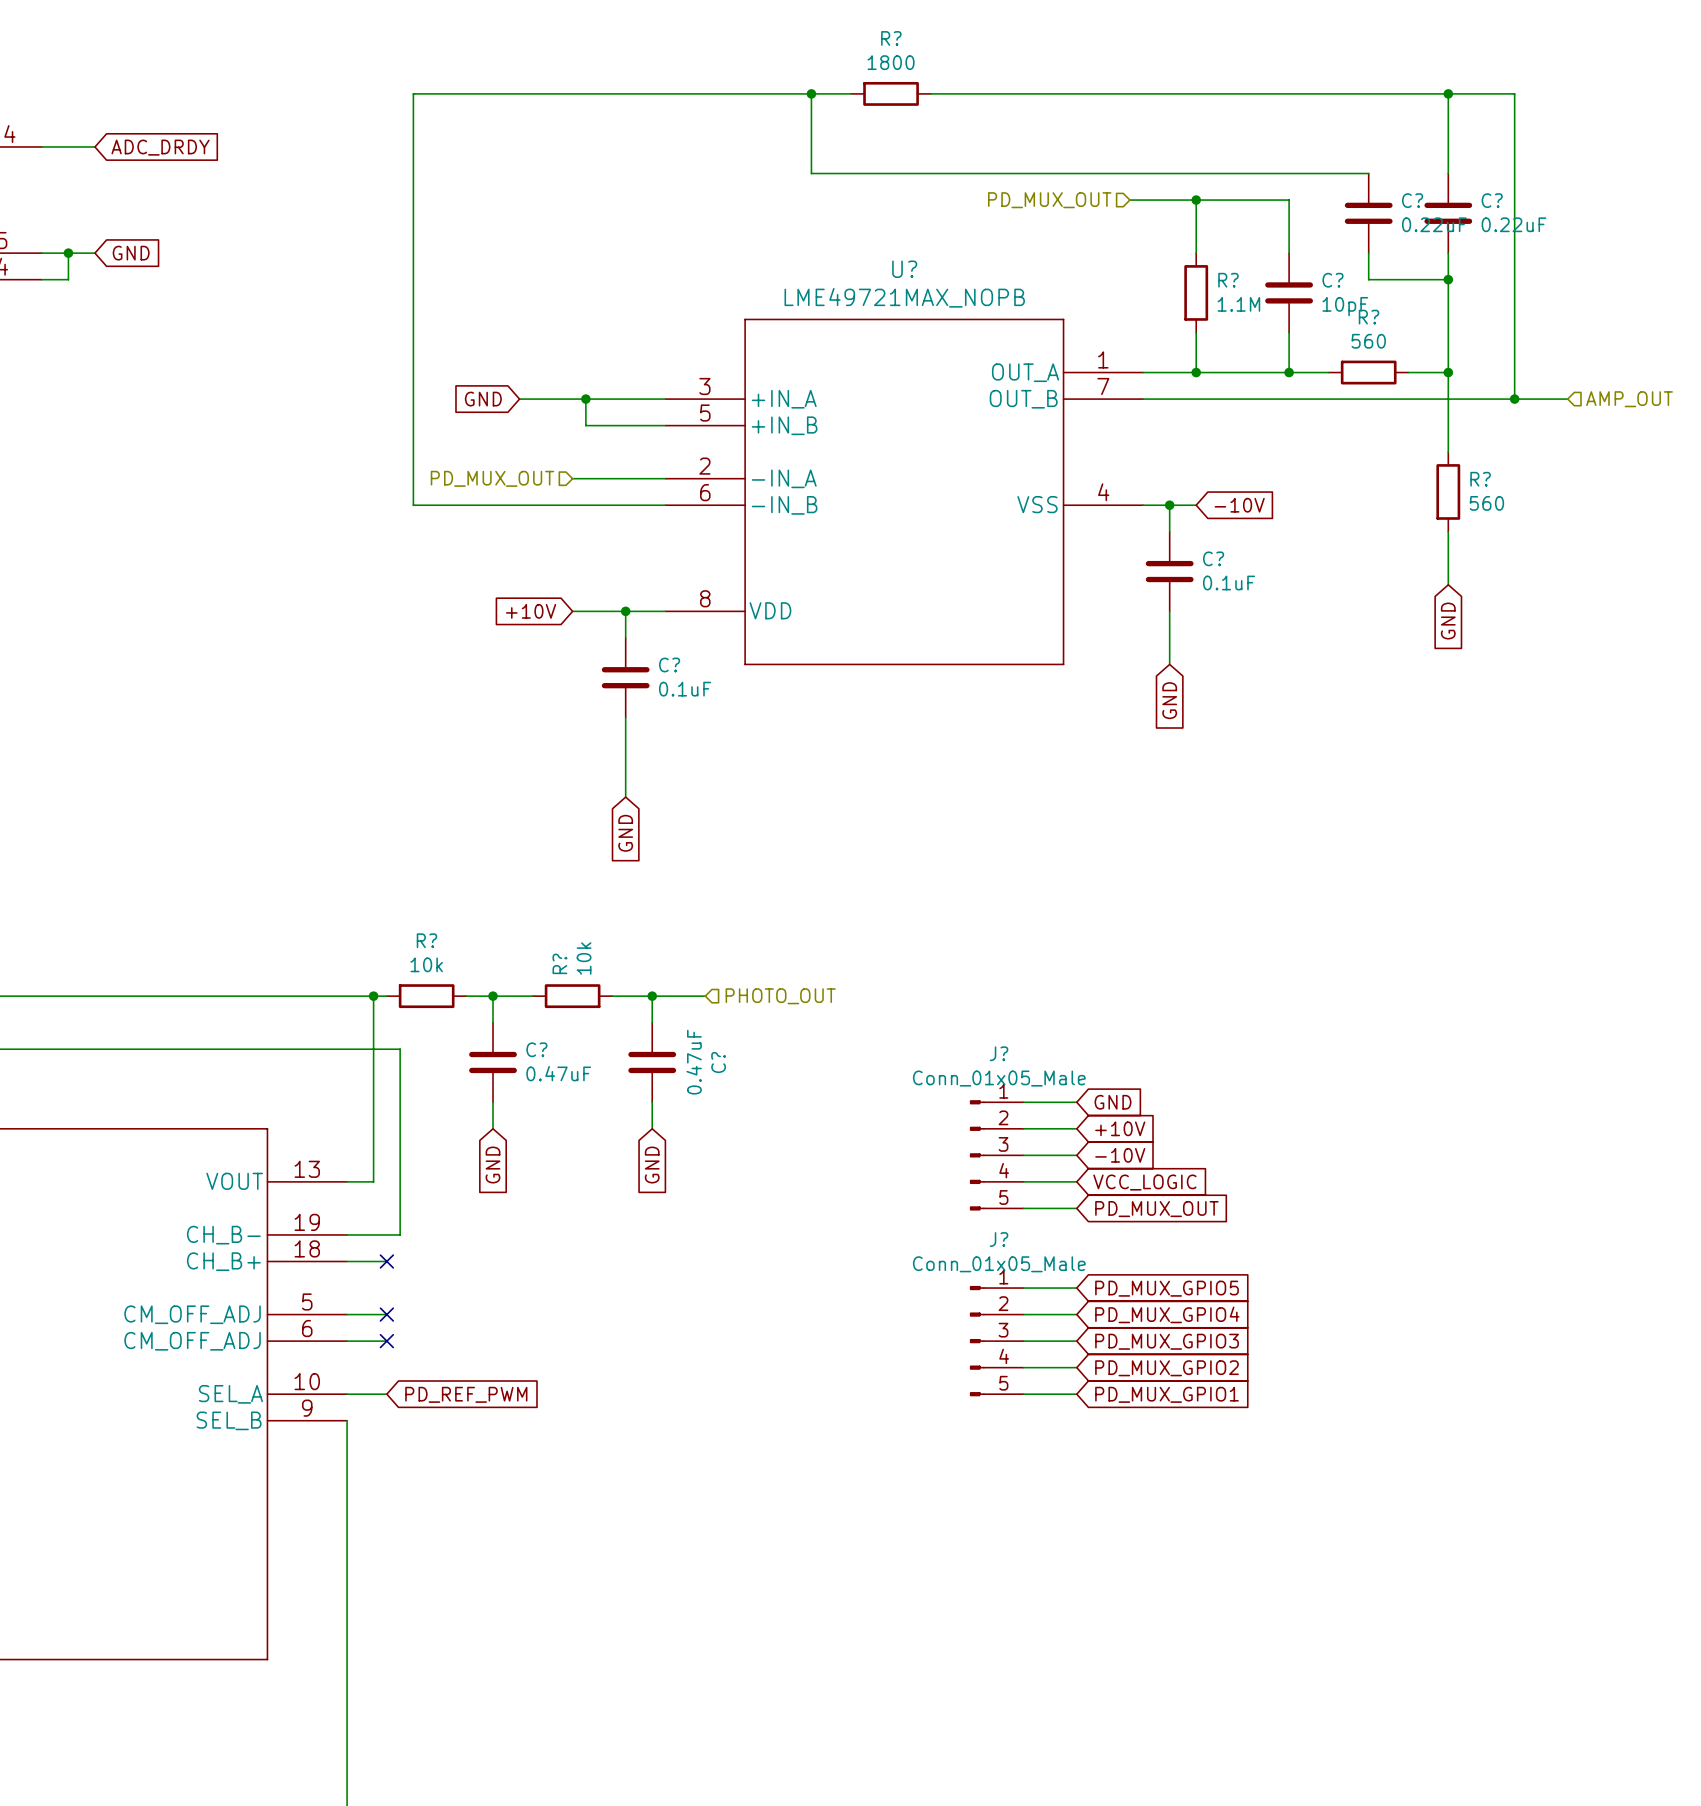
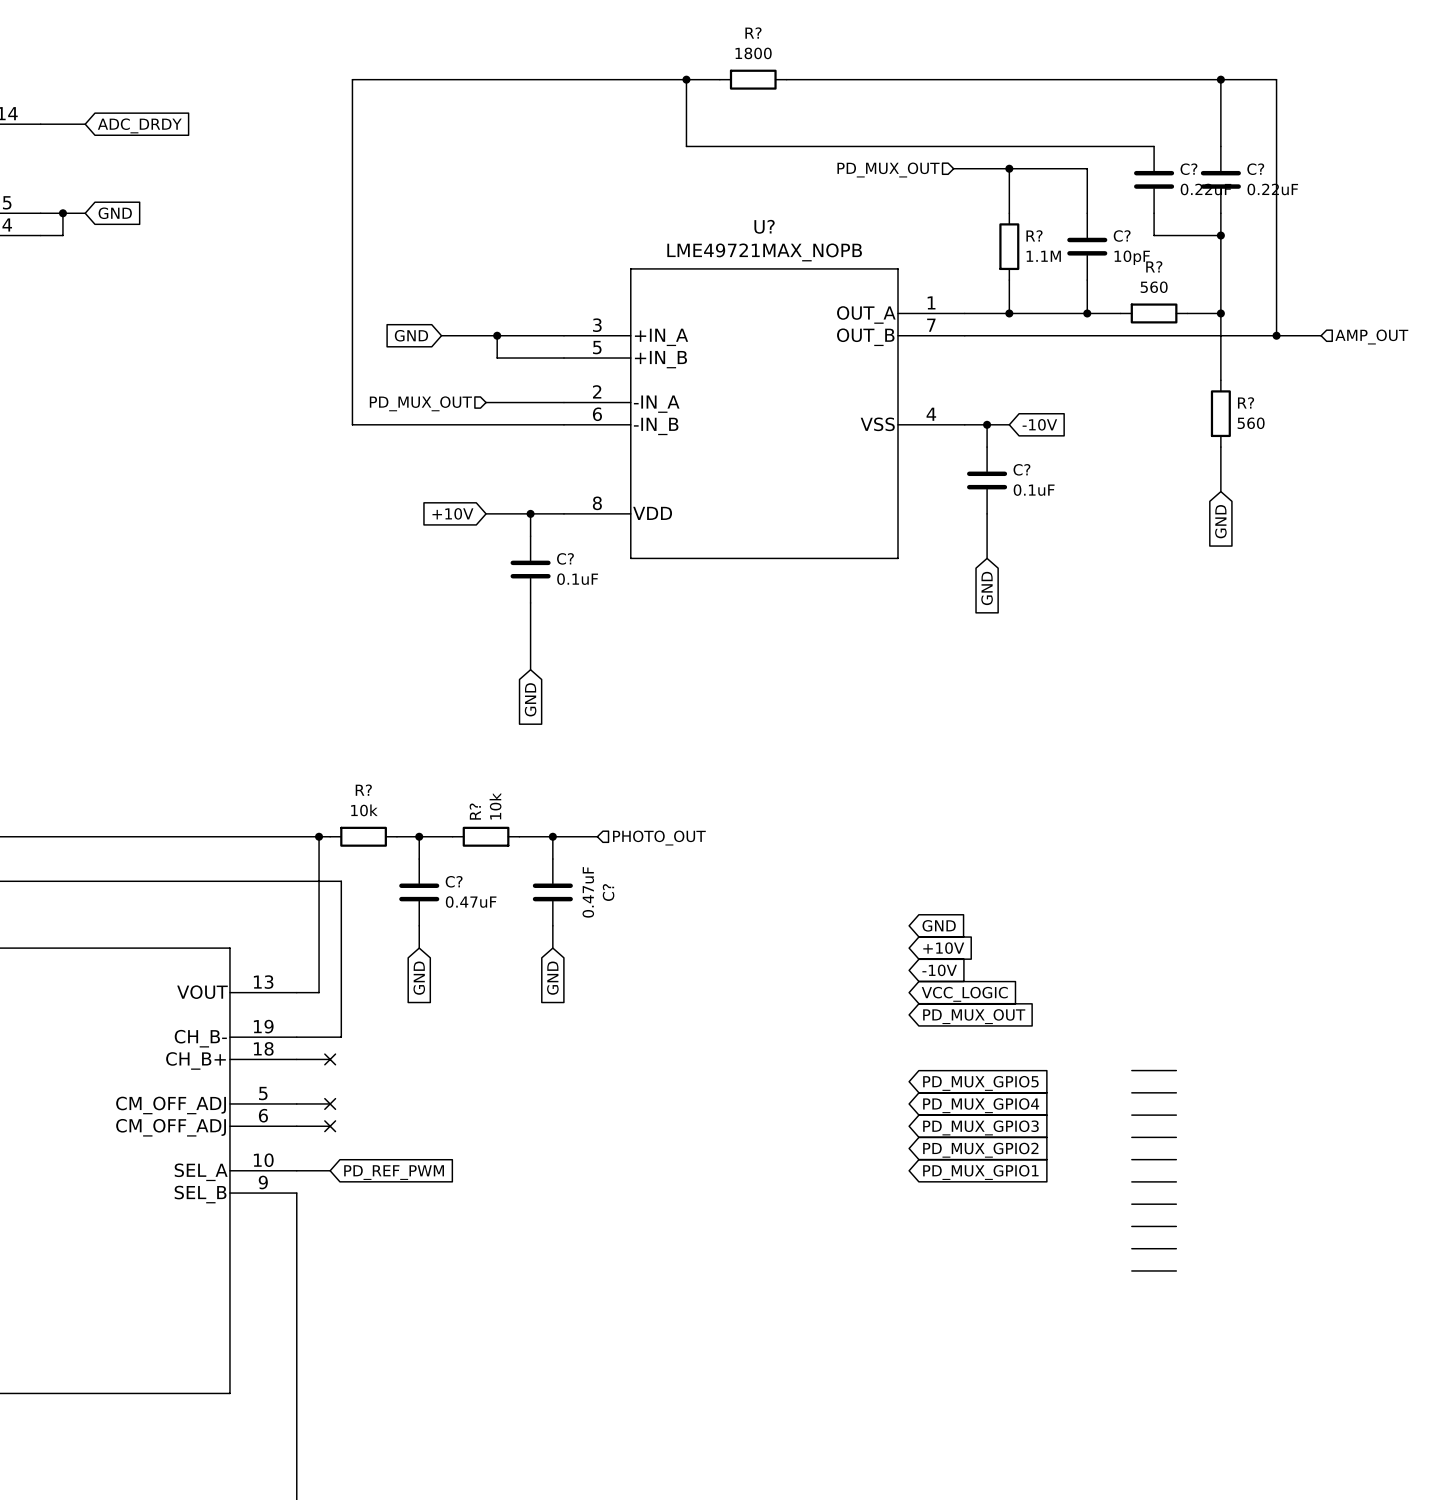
wire: (1023, 1102) (1076, 1102) -> none
wire: (1023, 1128) (1076, 1128) -> none
J?: Conn_01x05_Male (996, 1155) -> none
wire: (1023, 1155) (1076, 1155) -> none
wire: (1023, 1181) (1076, 1181) -> none
wire: (1023, 1208) (1076, 1208) -> none
wire: none -> (1131, 1070) (1176, 1070)
wire: (1023, 1288) (1076, 1288) -> none
wire: none -> (1131, 1092) (1176, 1092)
wire: (1023, 1314) (1076, 1314) -> none
wire: none -> (1131, 1115) (1176, 1115)
J?: Conn_01x05_Male (996, 1341) -> none
wire: (1023, 1341) (1076, 1341) -> none
wire: none -> (1131, 1137) (1176, 1137)
wire: (1023, 1367) (1076, 1367) -> none
wire: none -> (1131, 1159) (1176, 1159)
wire: (1023, 1394) (1076, 1394) -> none
wire: none -> (1131, 1181) (1176, 1181)
wire: none -> (1131, 1204) (1176, 1204)
wire: none -> (1131, 1226) (1176, 1226)
wire: none -> (1131, 1248) (1176, 1248)
wire: none -> (1131, 1270) (1176, 1270)

